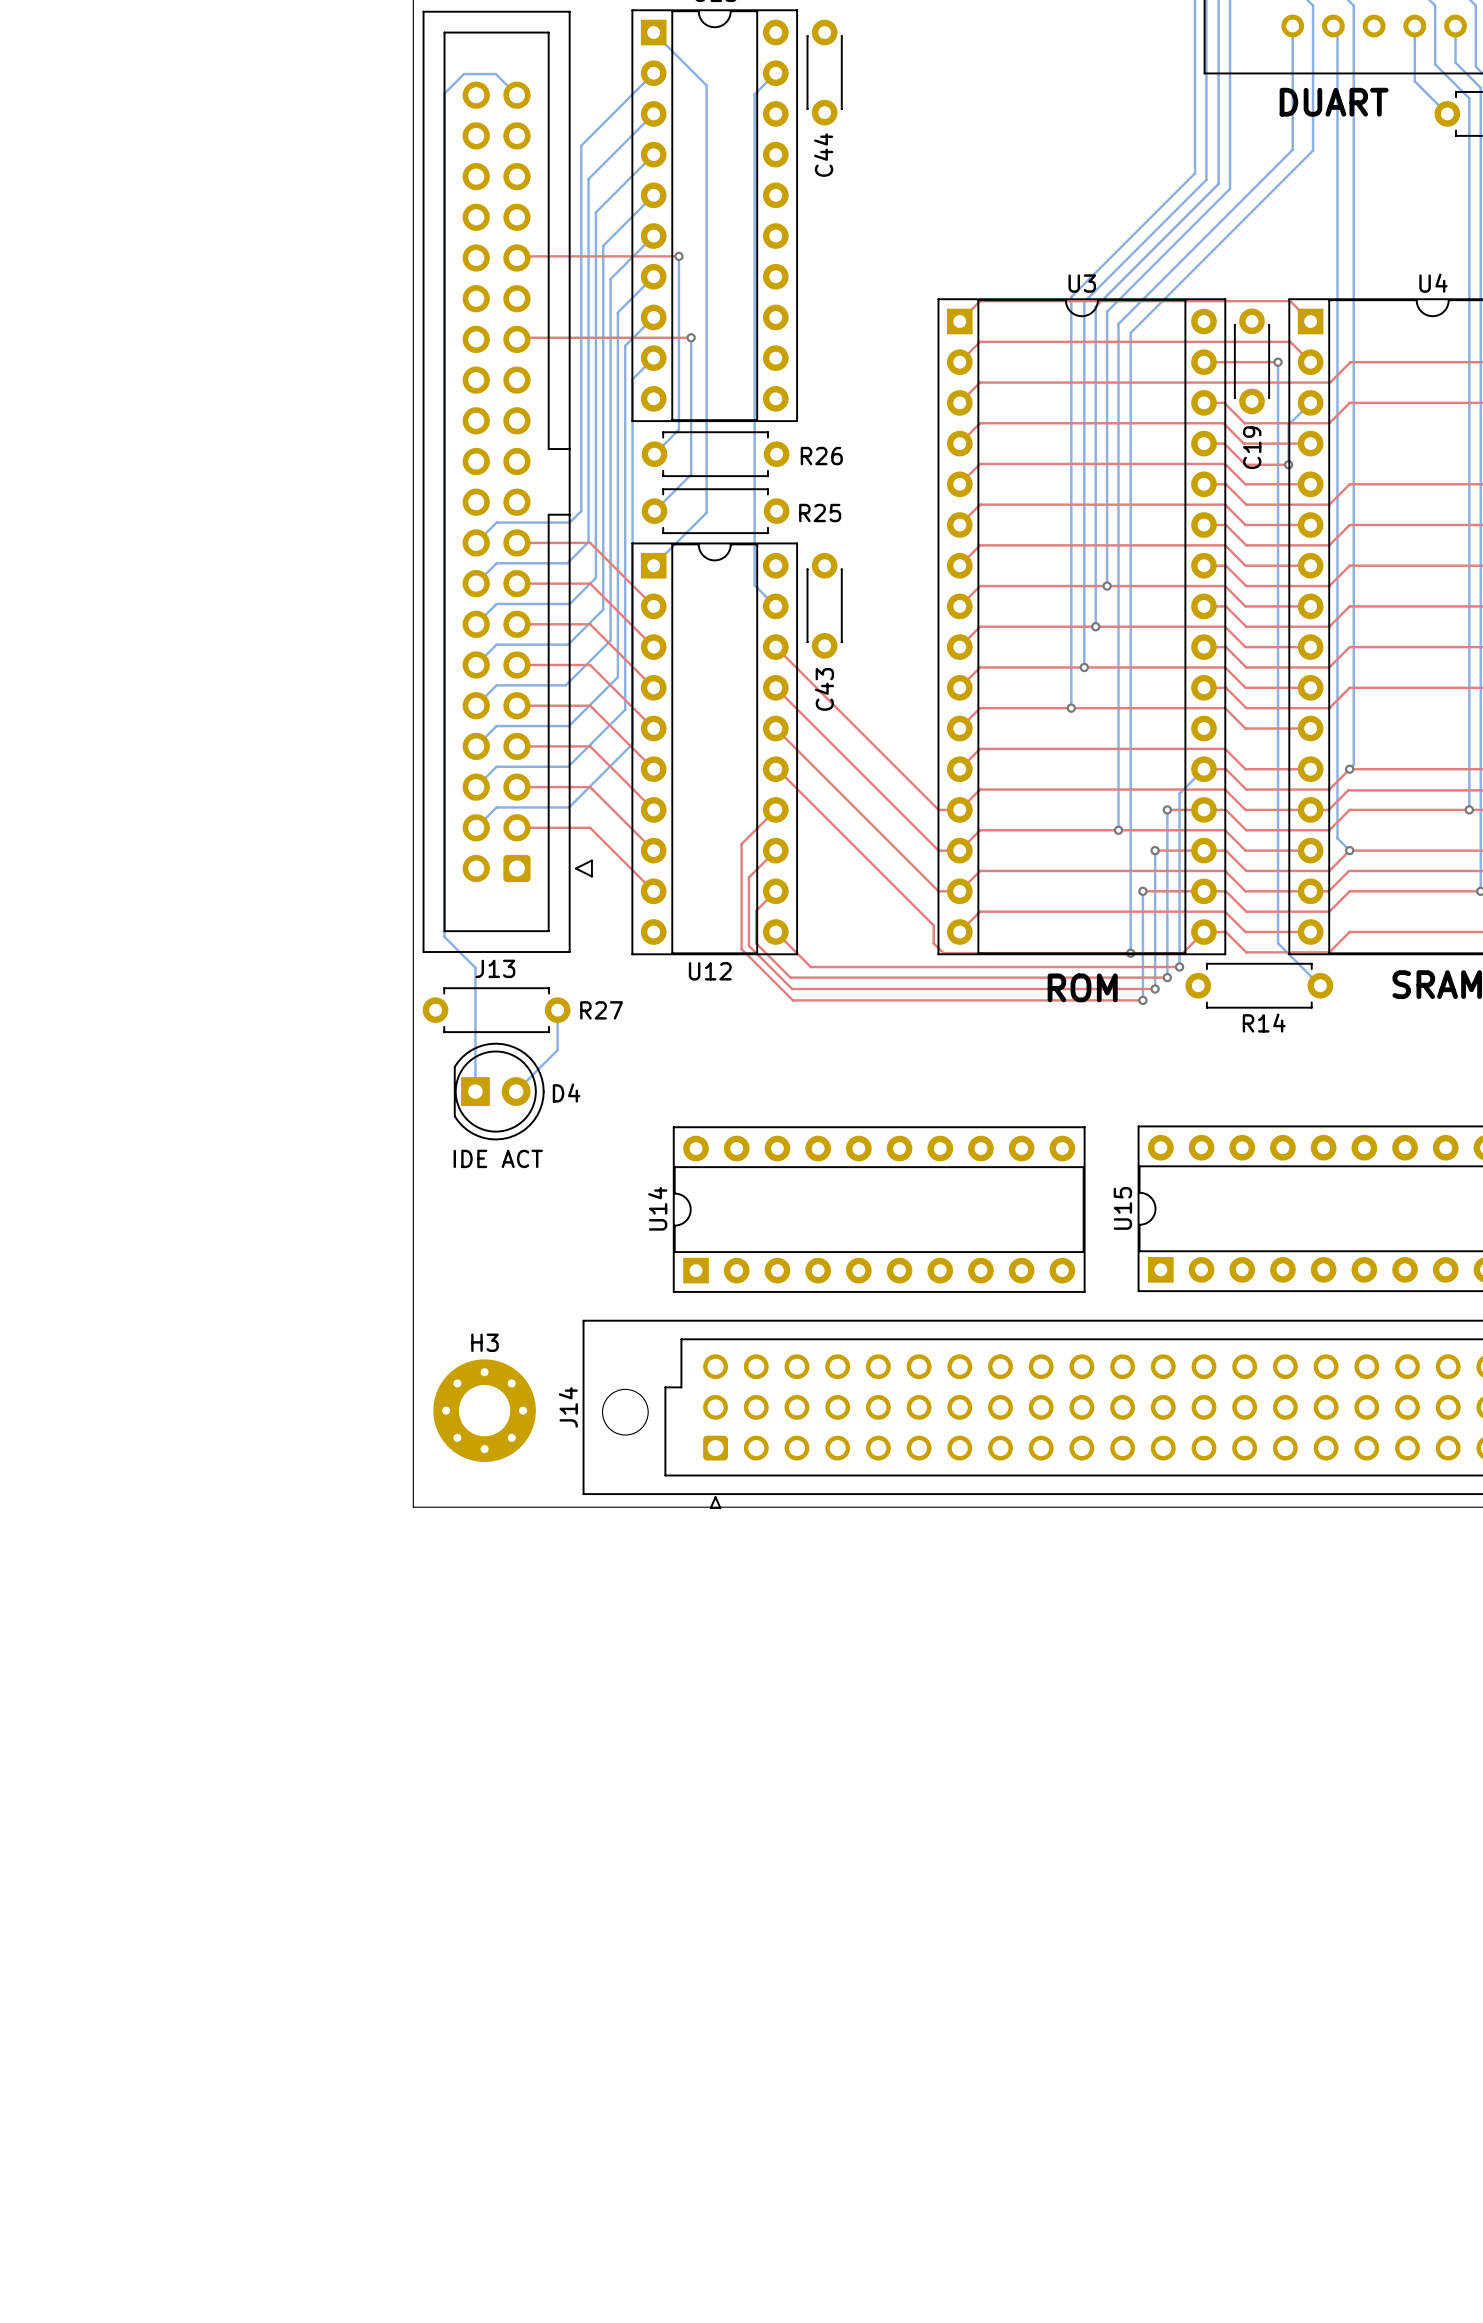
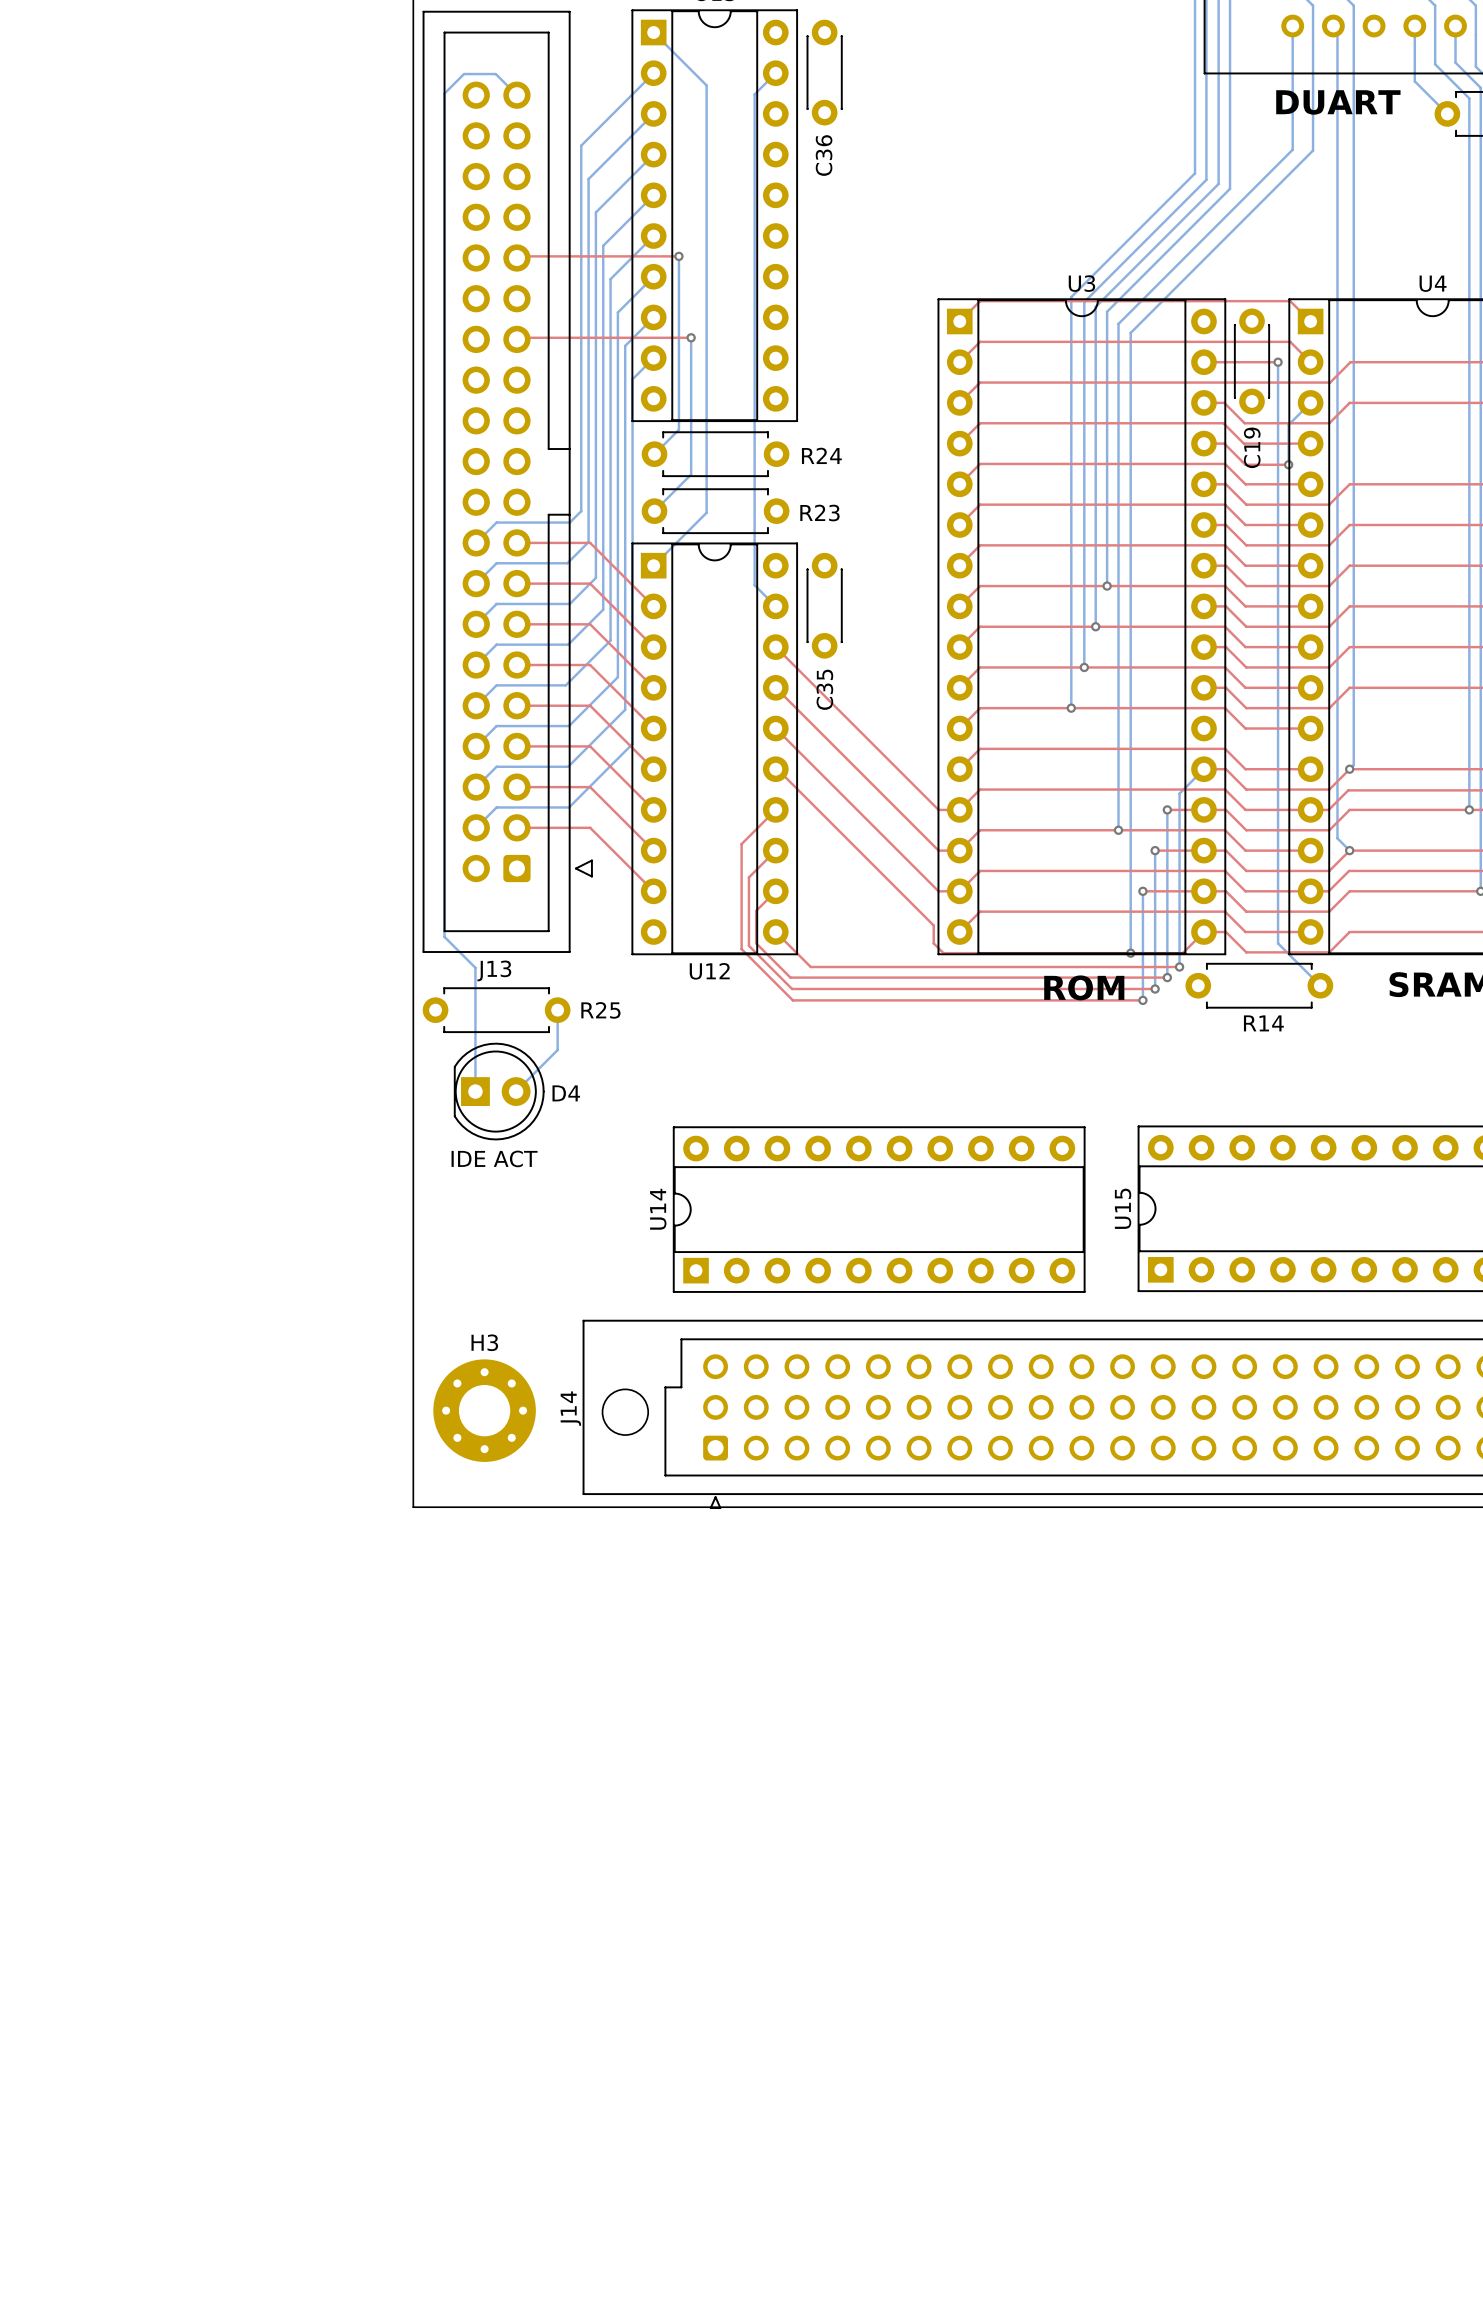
C44 name: C44 (823, 155) -> C36 (824, 155)
R26 name: R26 (821, 456) -> R24 (821, 455)
R25 name: R25 (820, 513) -> R23 (819, 513)
C43 name: C43 (824, 689) -> C35 (824, 689)
R27 name: R27 (601, 1010) -> R25 (600, 1010)

